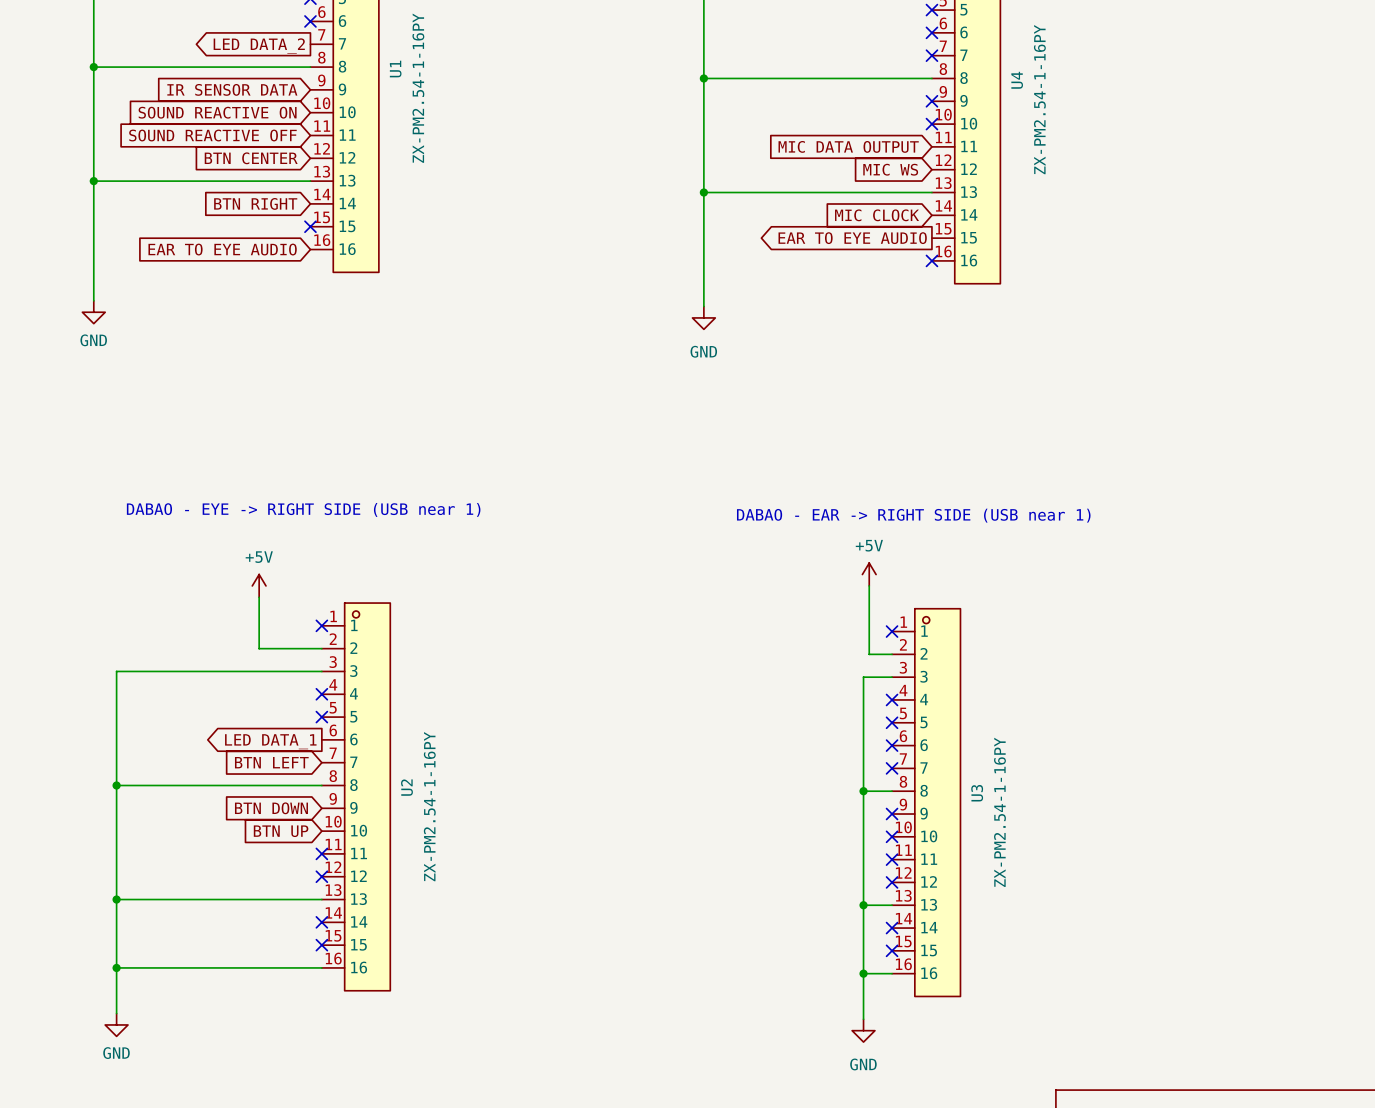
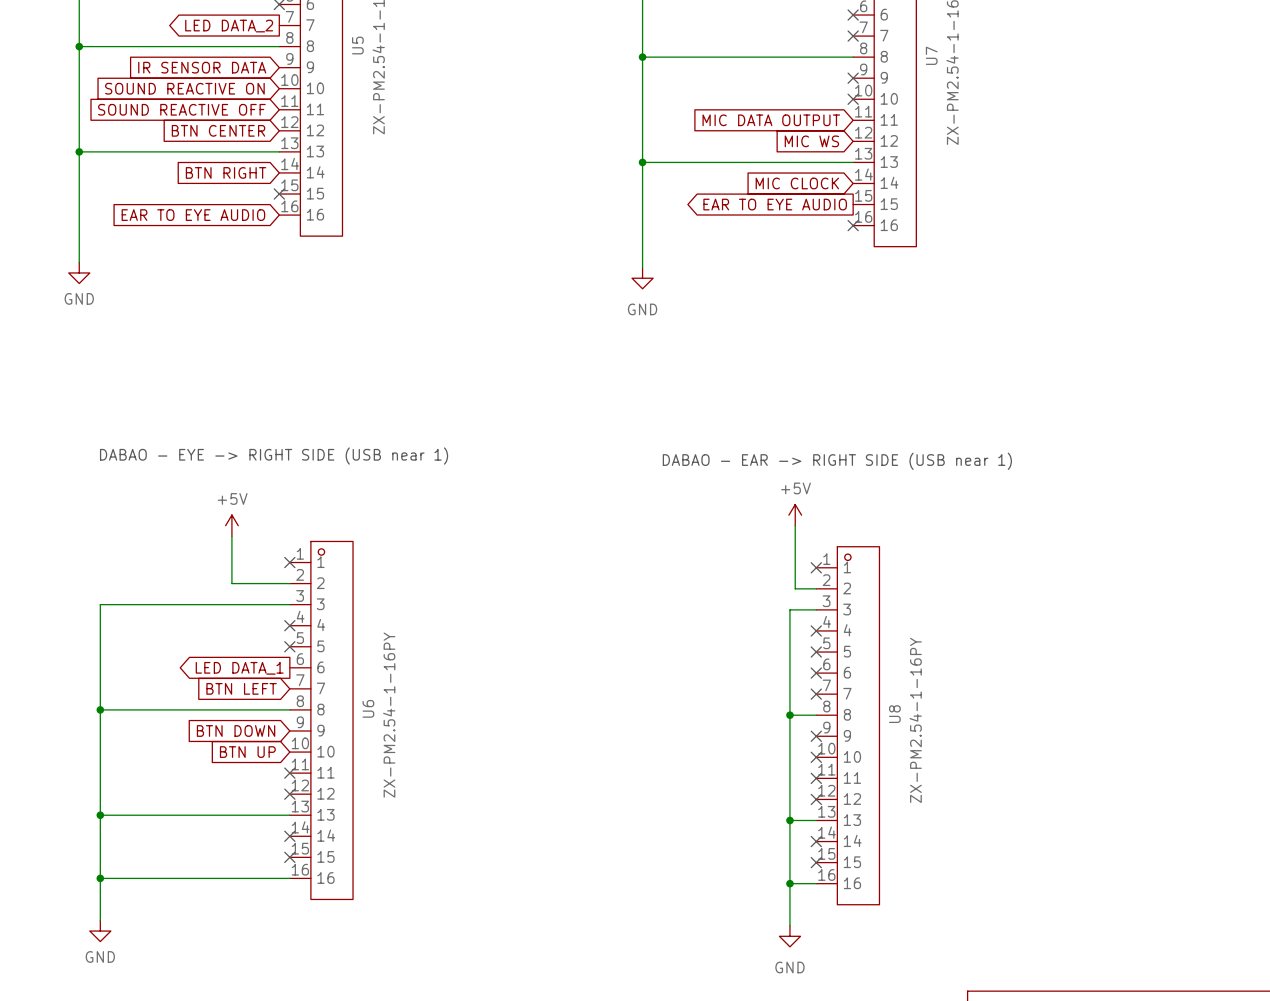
U1 name: U1 (395, 69) -> U5 (357, 45)
U4 name: U4 (1017, 80) -> U7 (931, 55)
U2 name: U2 (406, 787) -> U6 (368, 708)
U3 name: U3 (977, 793) -> U8 (894, 714)

